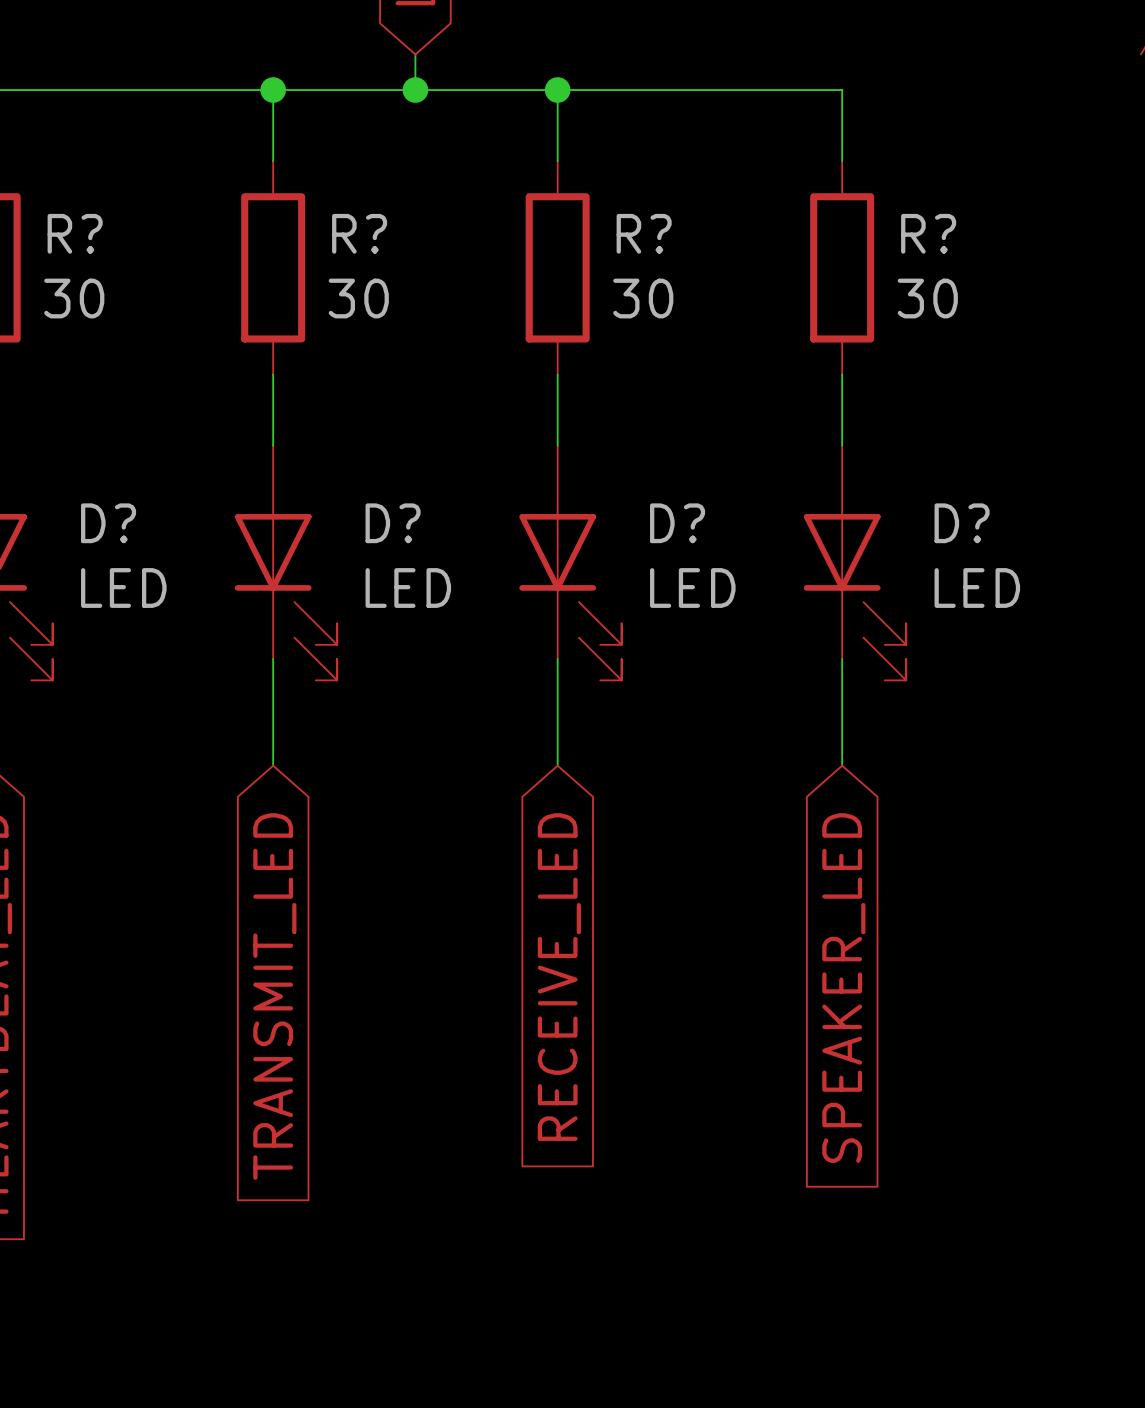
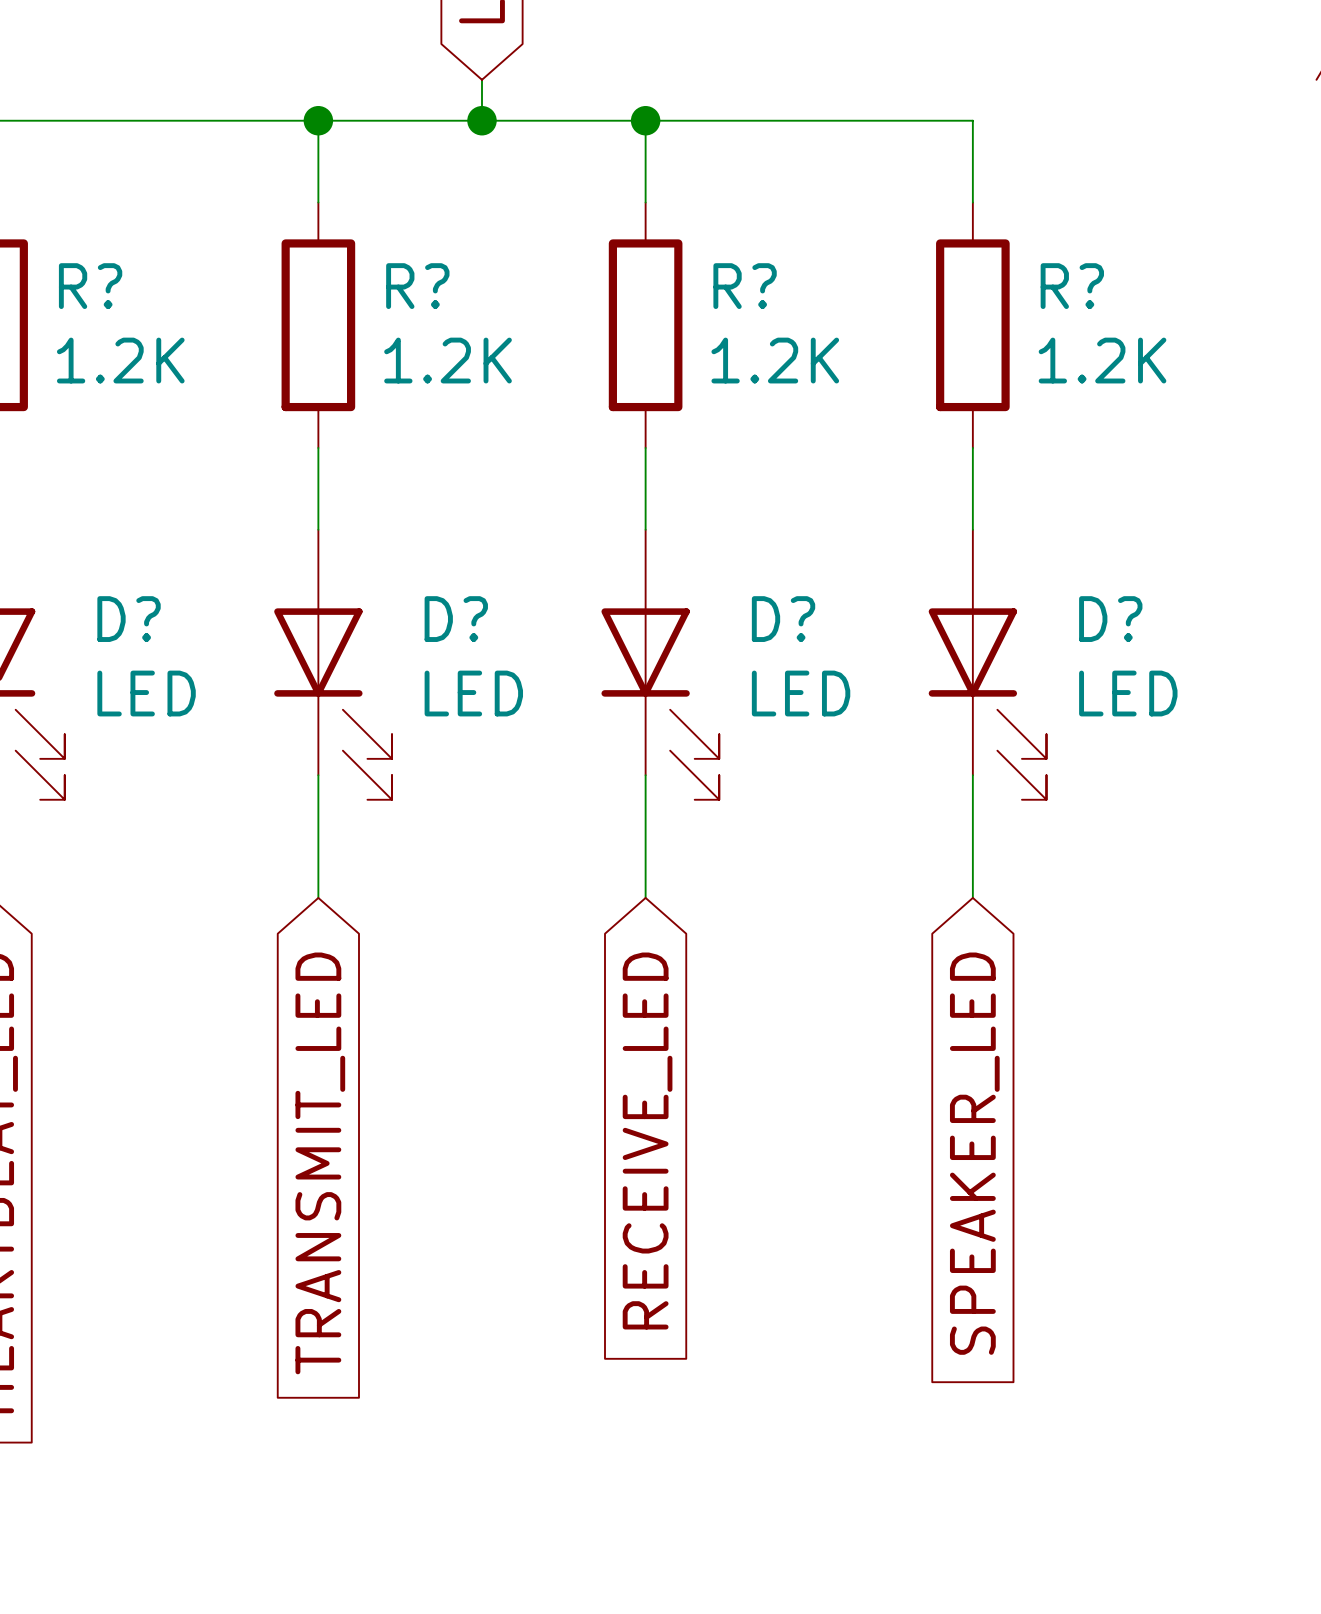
R? value: 30 (74, 298) -> 1.2K (120, 360)
R? value: 30 (358, 298) -> 1.2K (448, 360)
R? value: 30 (643, 298) -> 1.2K (775, 360)
R? value: 30 (927, 298) -> 1.2K (1102, 360)

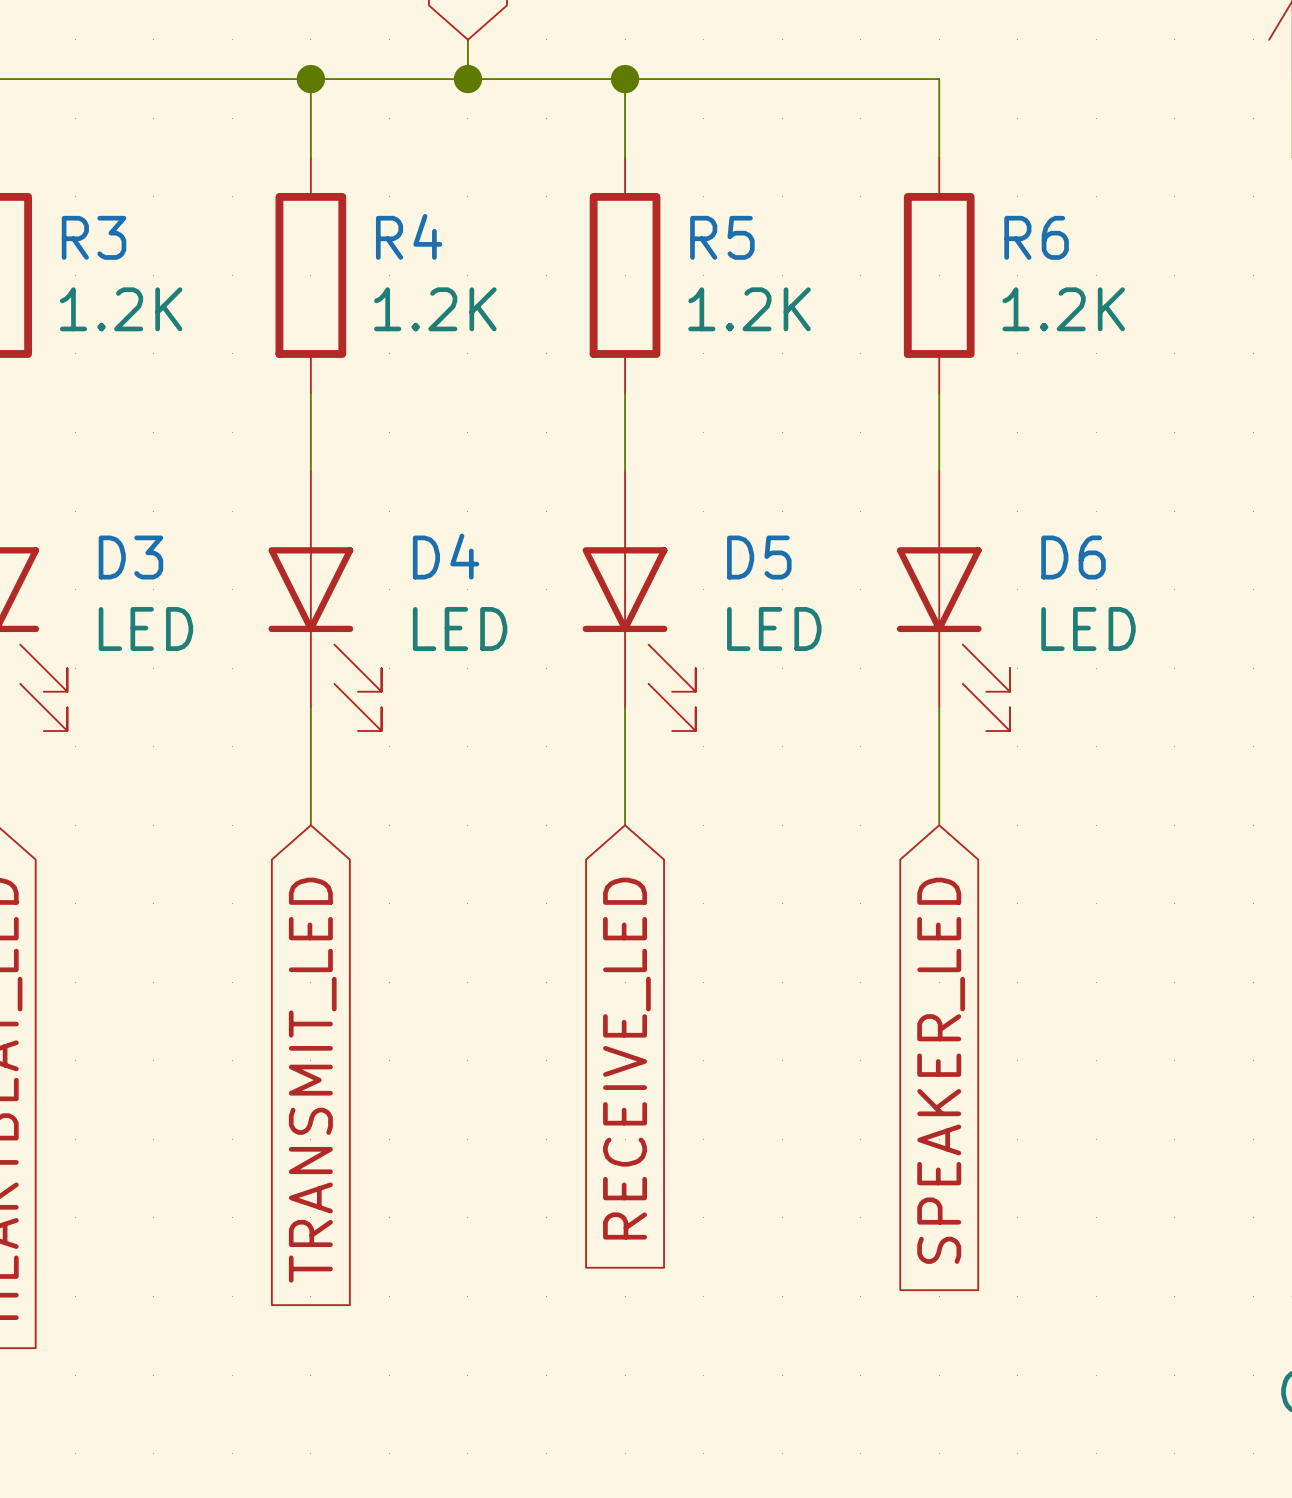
R? name: R? (90, 286) -> R3 (94, 237)
R? name: R? (417, 286) -> R4 (409, 236)
R? name: R? (745, 286) -> R5 (722, 237)
R? name: R? (1072, 286) -> R6 (1036, 237)
D? name: D? (129, 619) -> D3 (130, 557)
D? name: D? (456, 619) -> D4 (446, 556)
D? name: D? (783, 619) -> D5 (759, 557)
D? name: D? (1110, 619) -> D6 (1073, 557)

